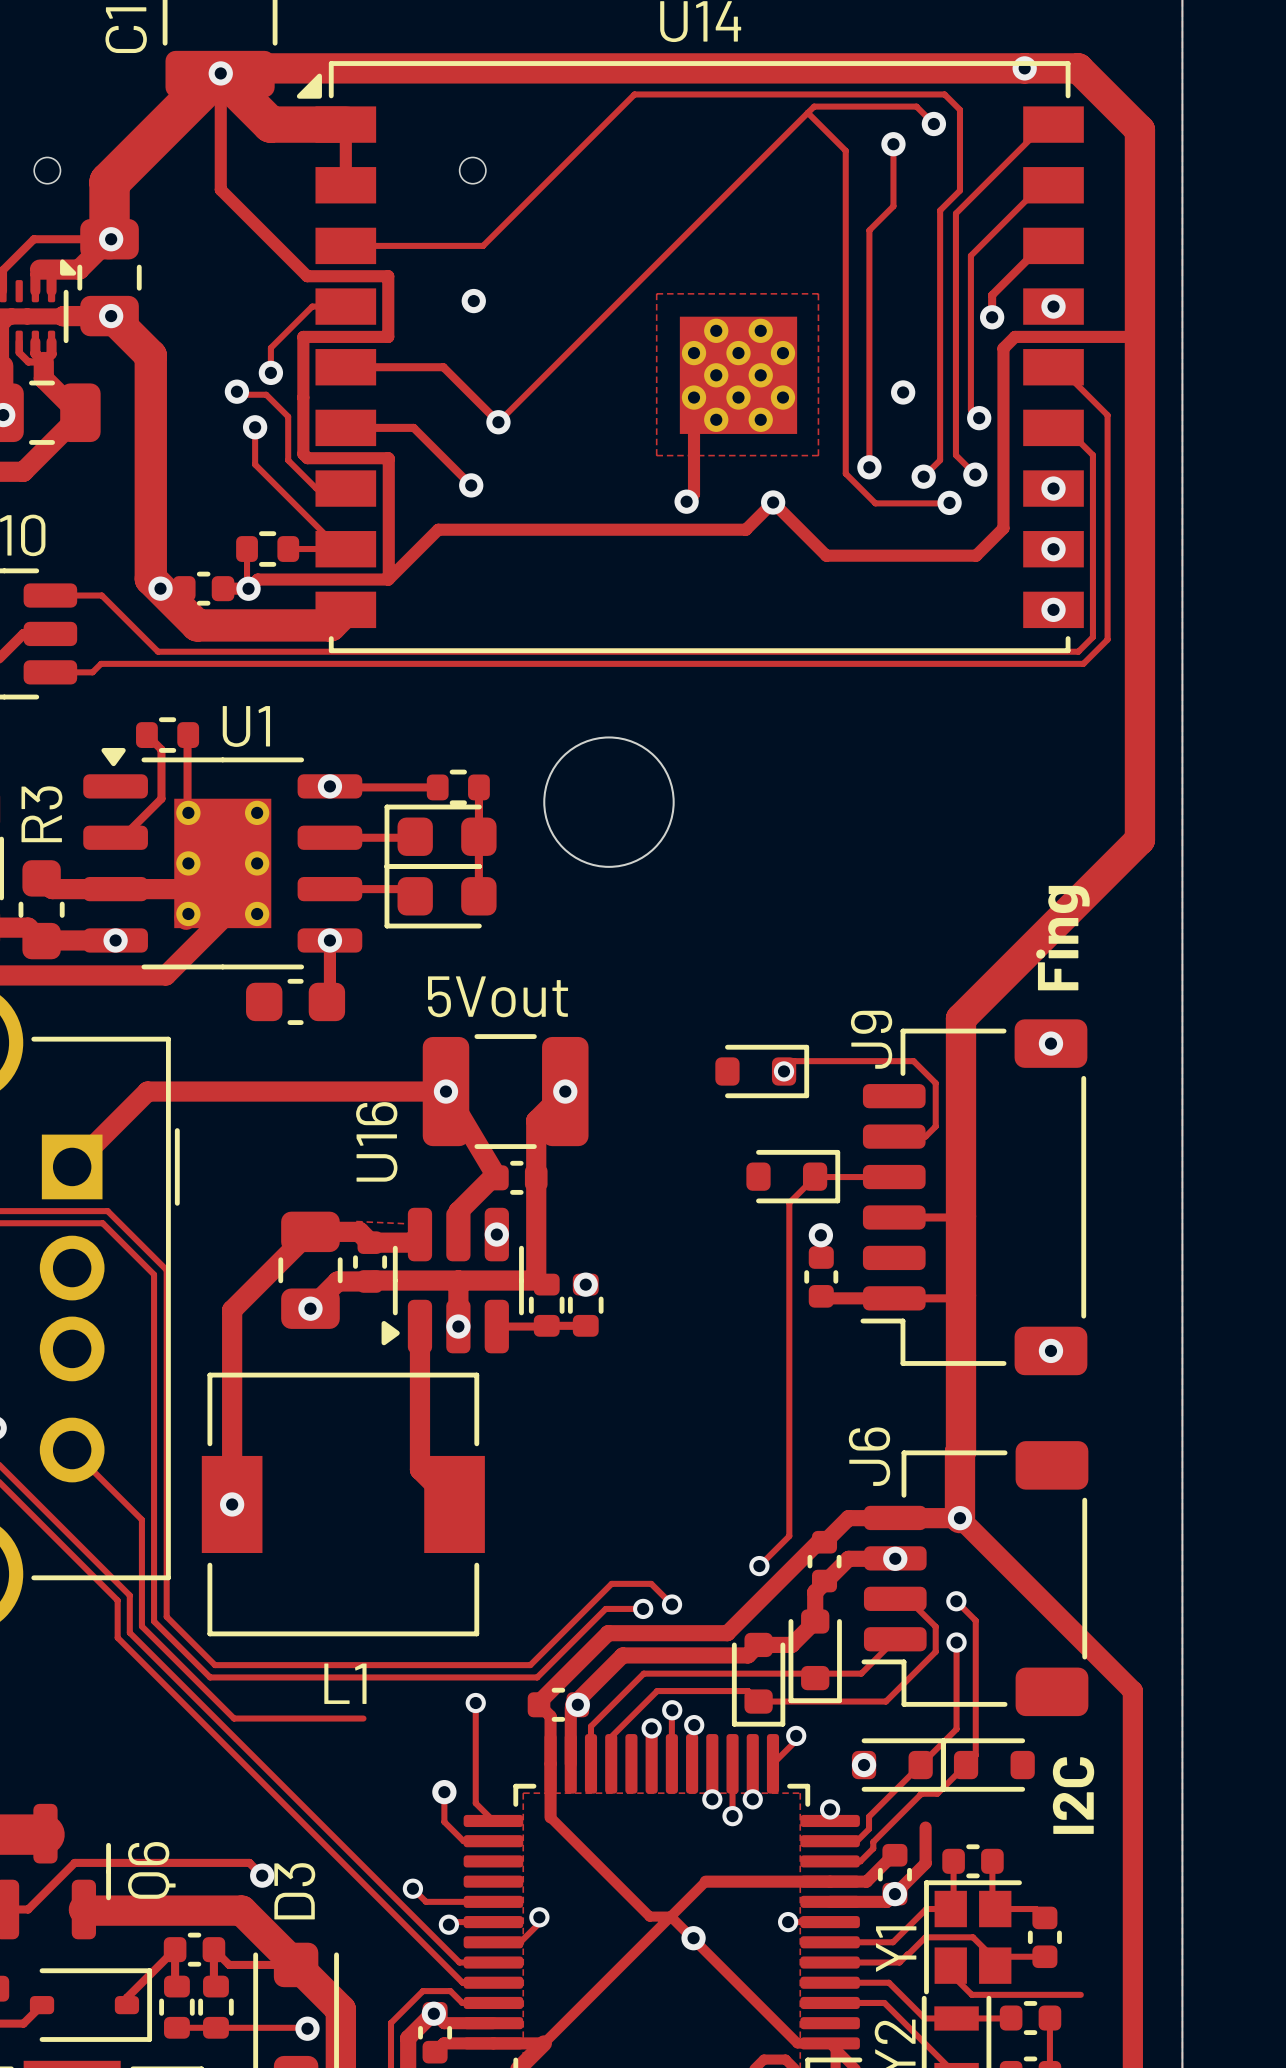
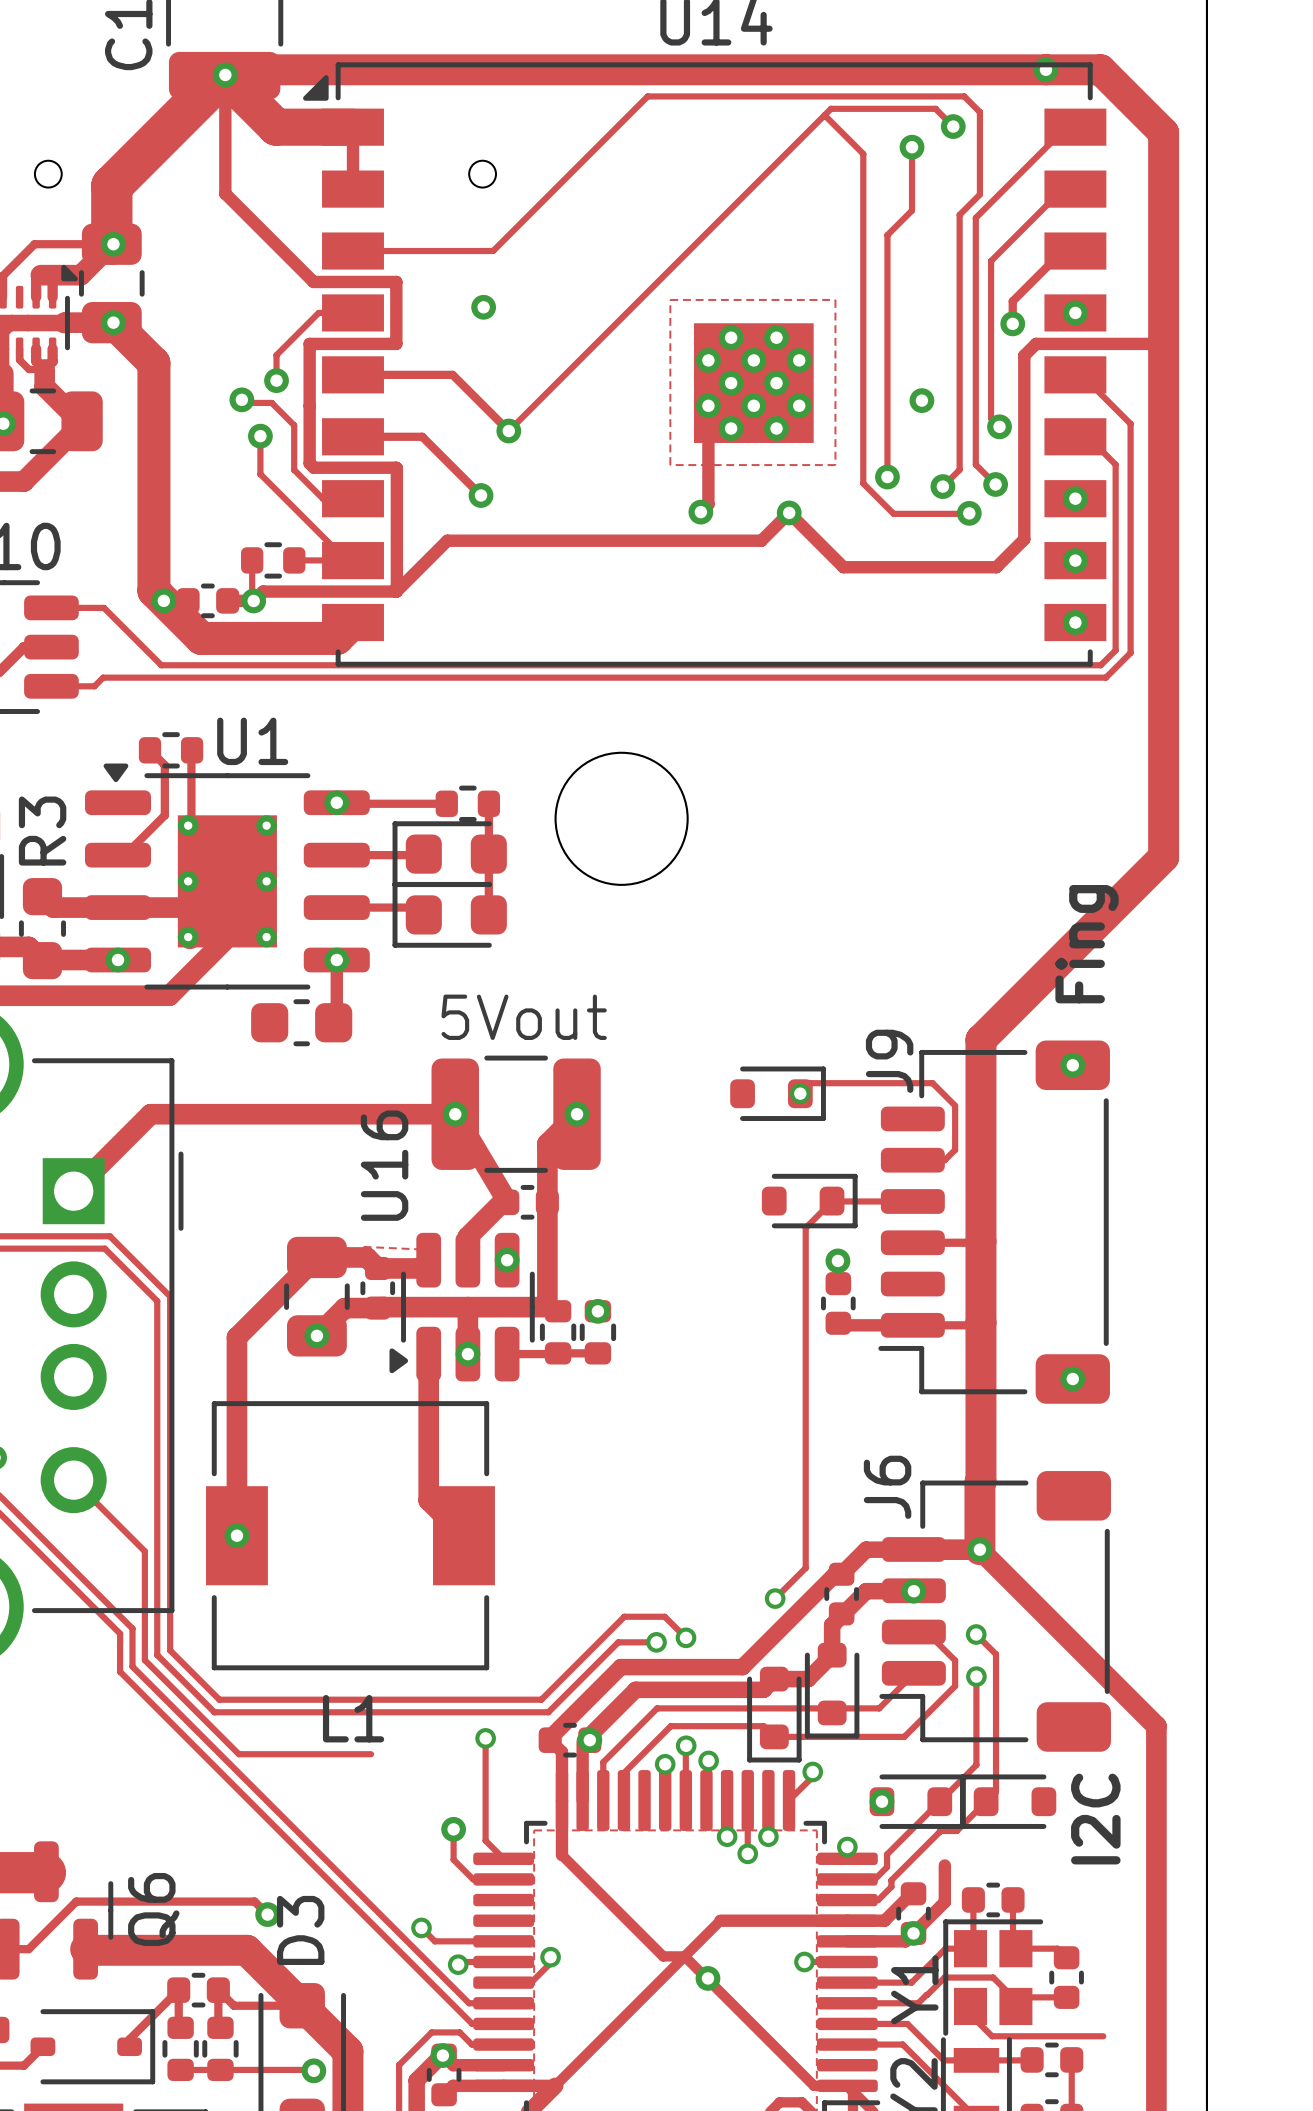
U1 footprint: [83, 747, 363, 970] -> [84, 763, 370, 990]

